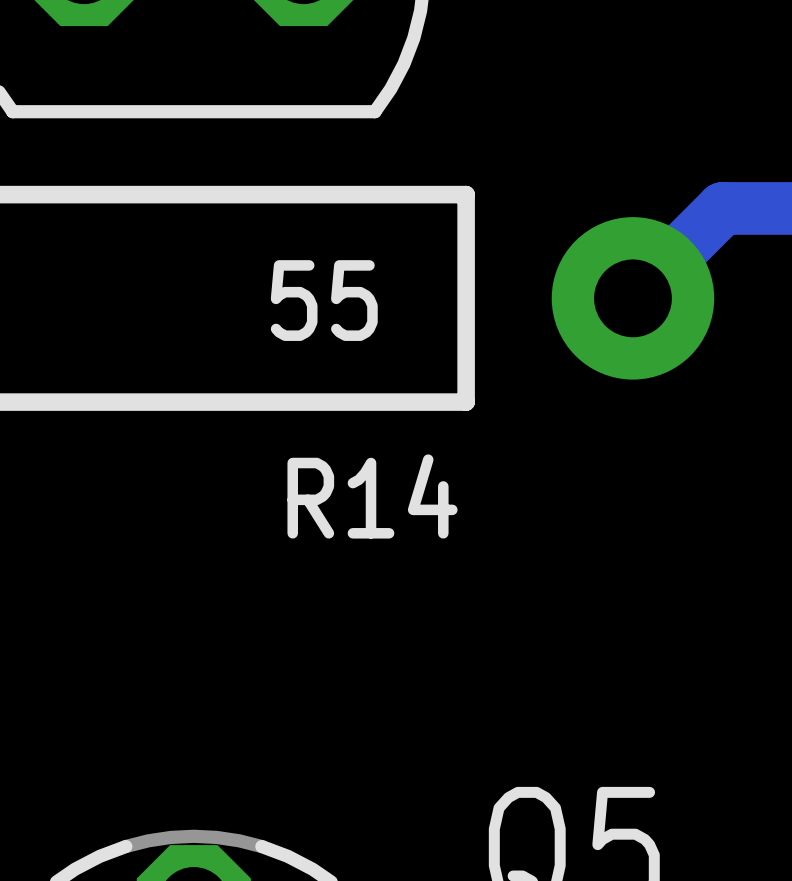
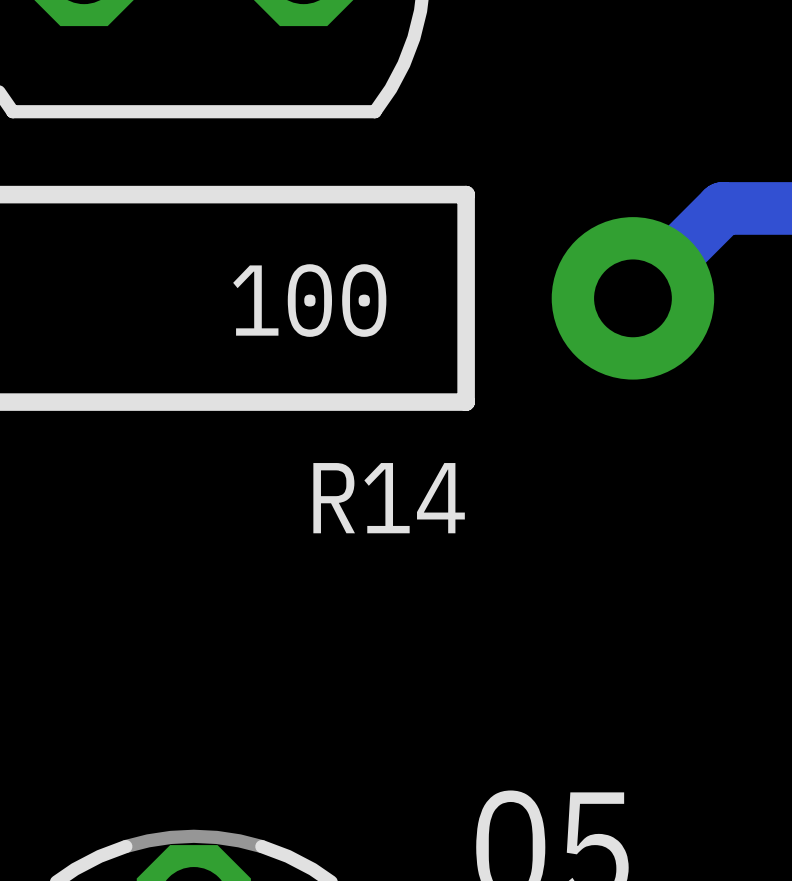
R14 value: 55 (324, 300) -> 100 (309, 300)

